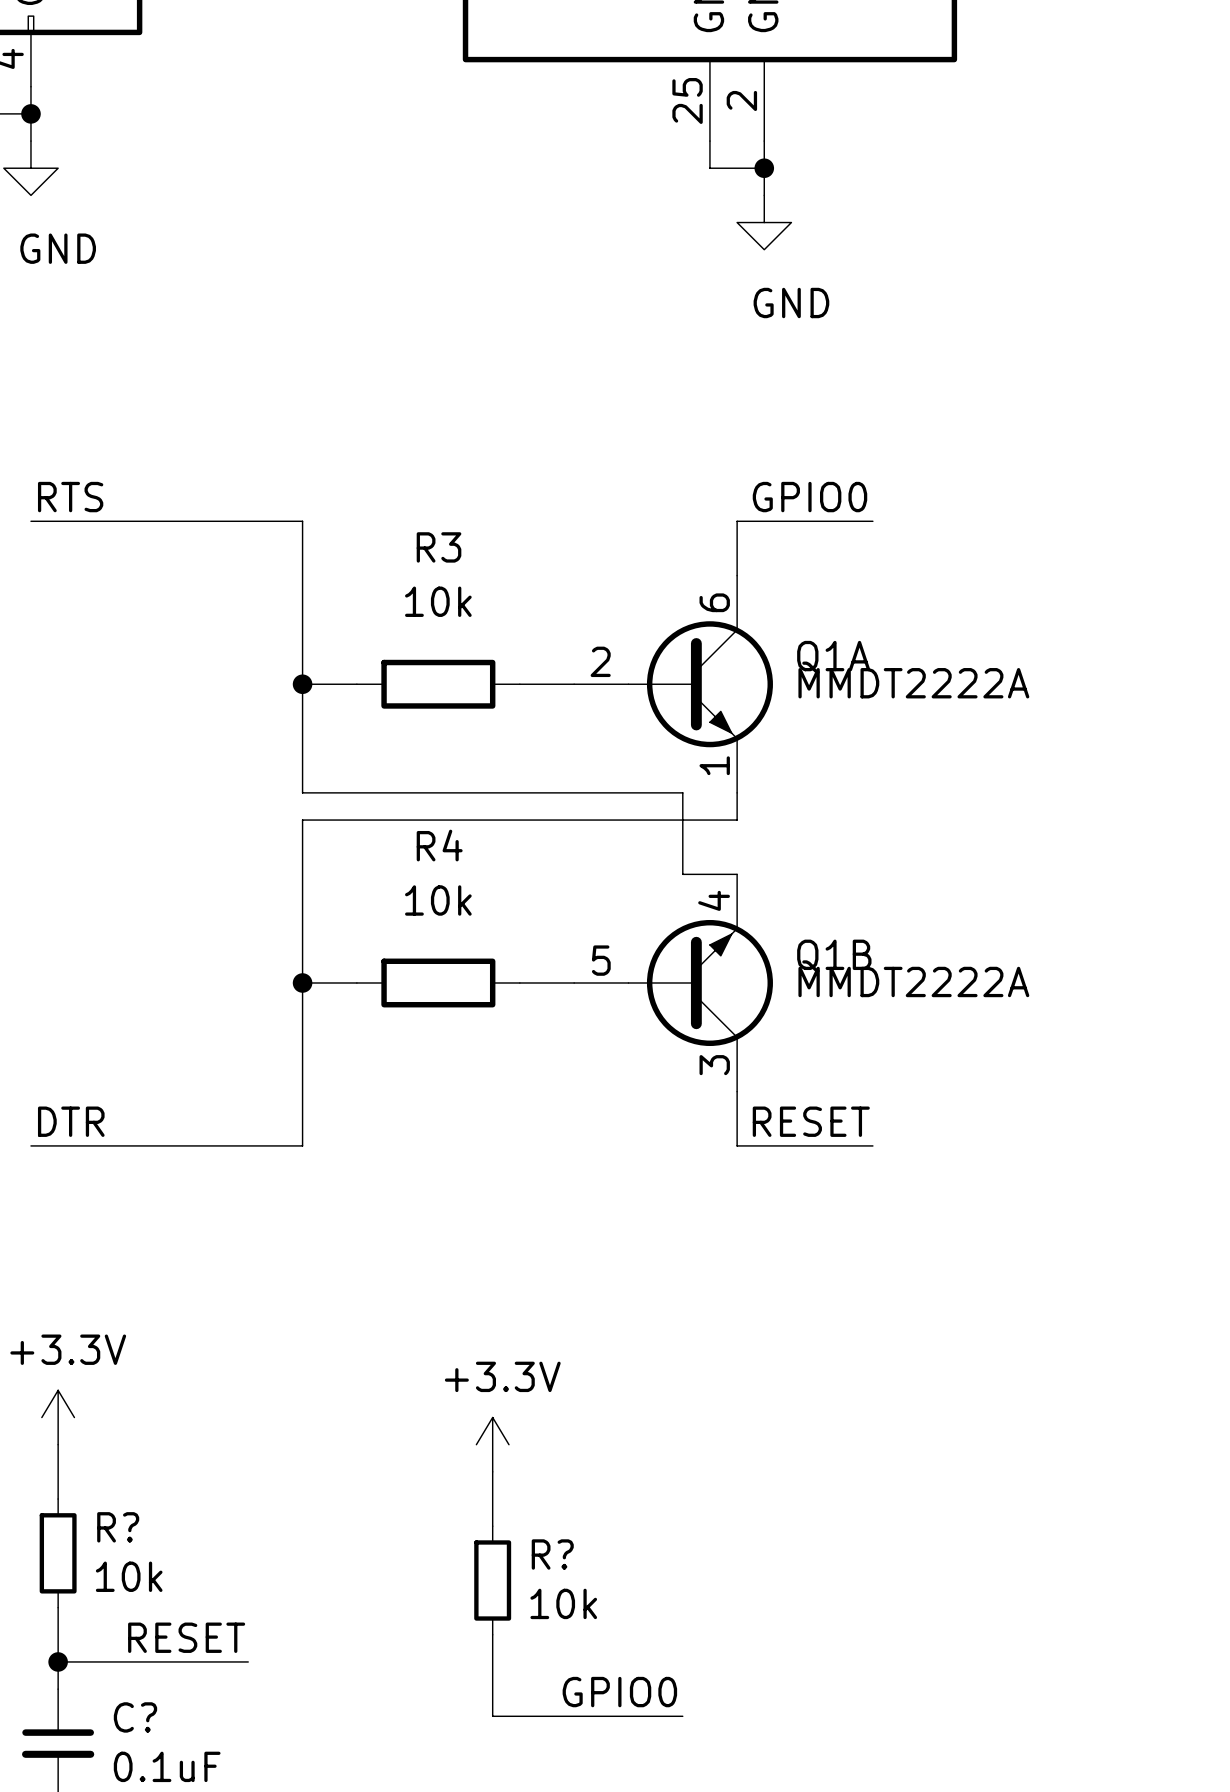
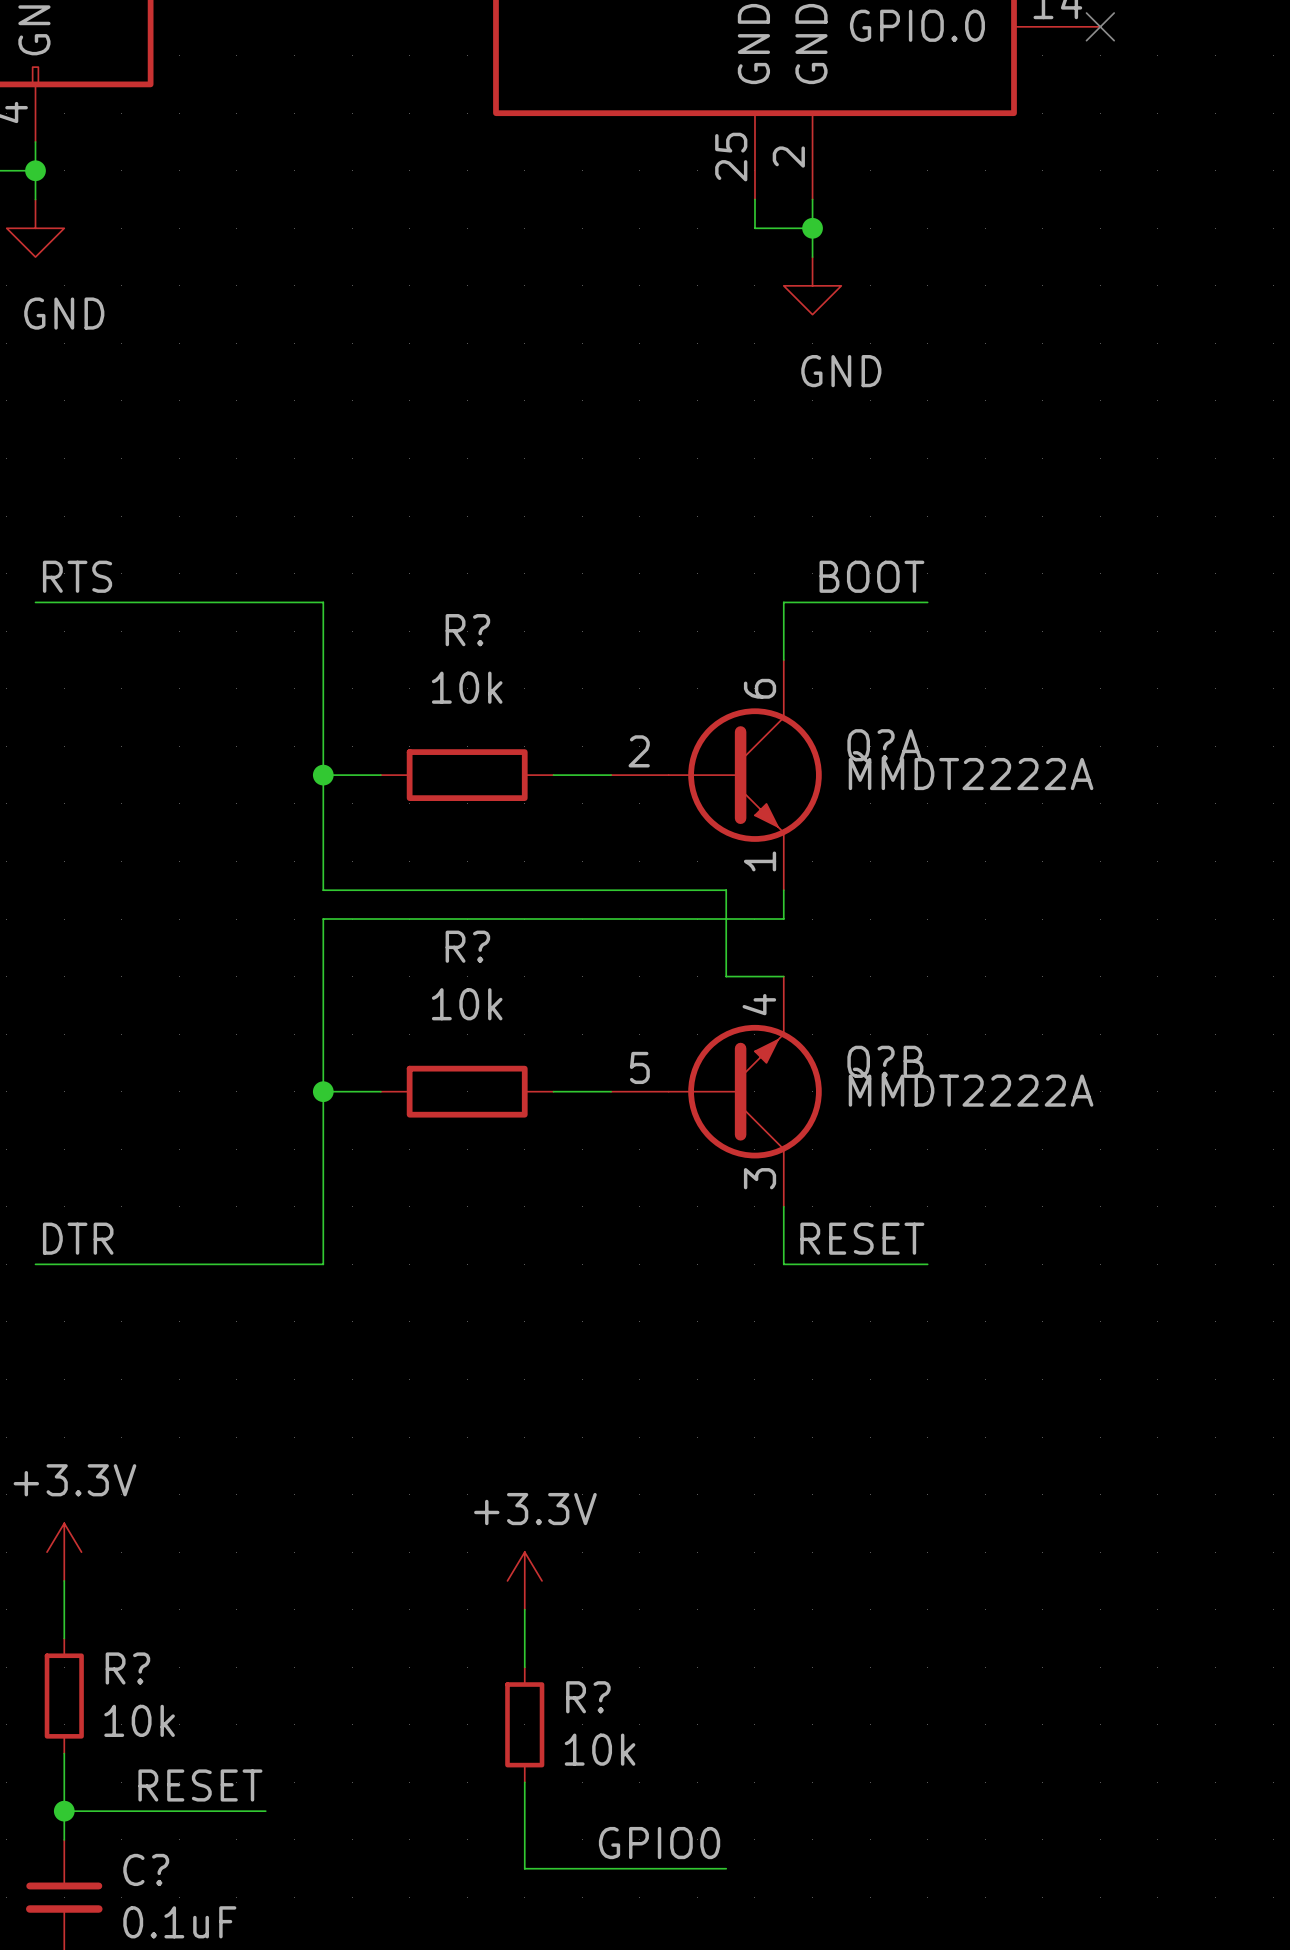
label: GPIO0 (809, 497) -> BOOT (871, 576)
R3 name: R3 (439, 547) -> R? (467, 630)
Q1A name: Q1A (833, 657) -> Q?A (884, 746)
R4 name: R4 (439, 845) -> R? (467, 946)
Q1B name: Q1B (834, 956) -> Q?B (885, 1063)

